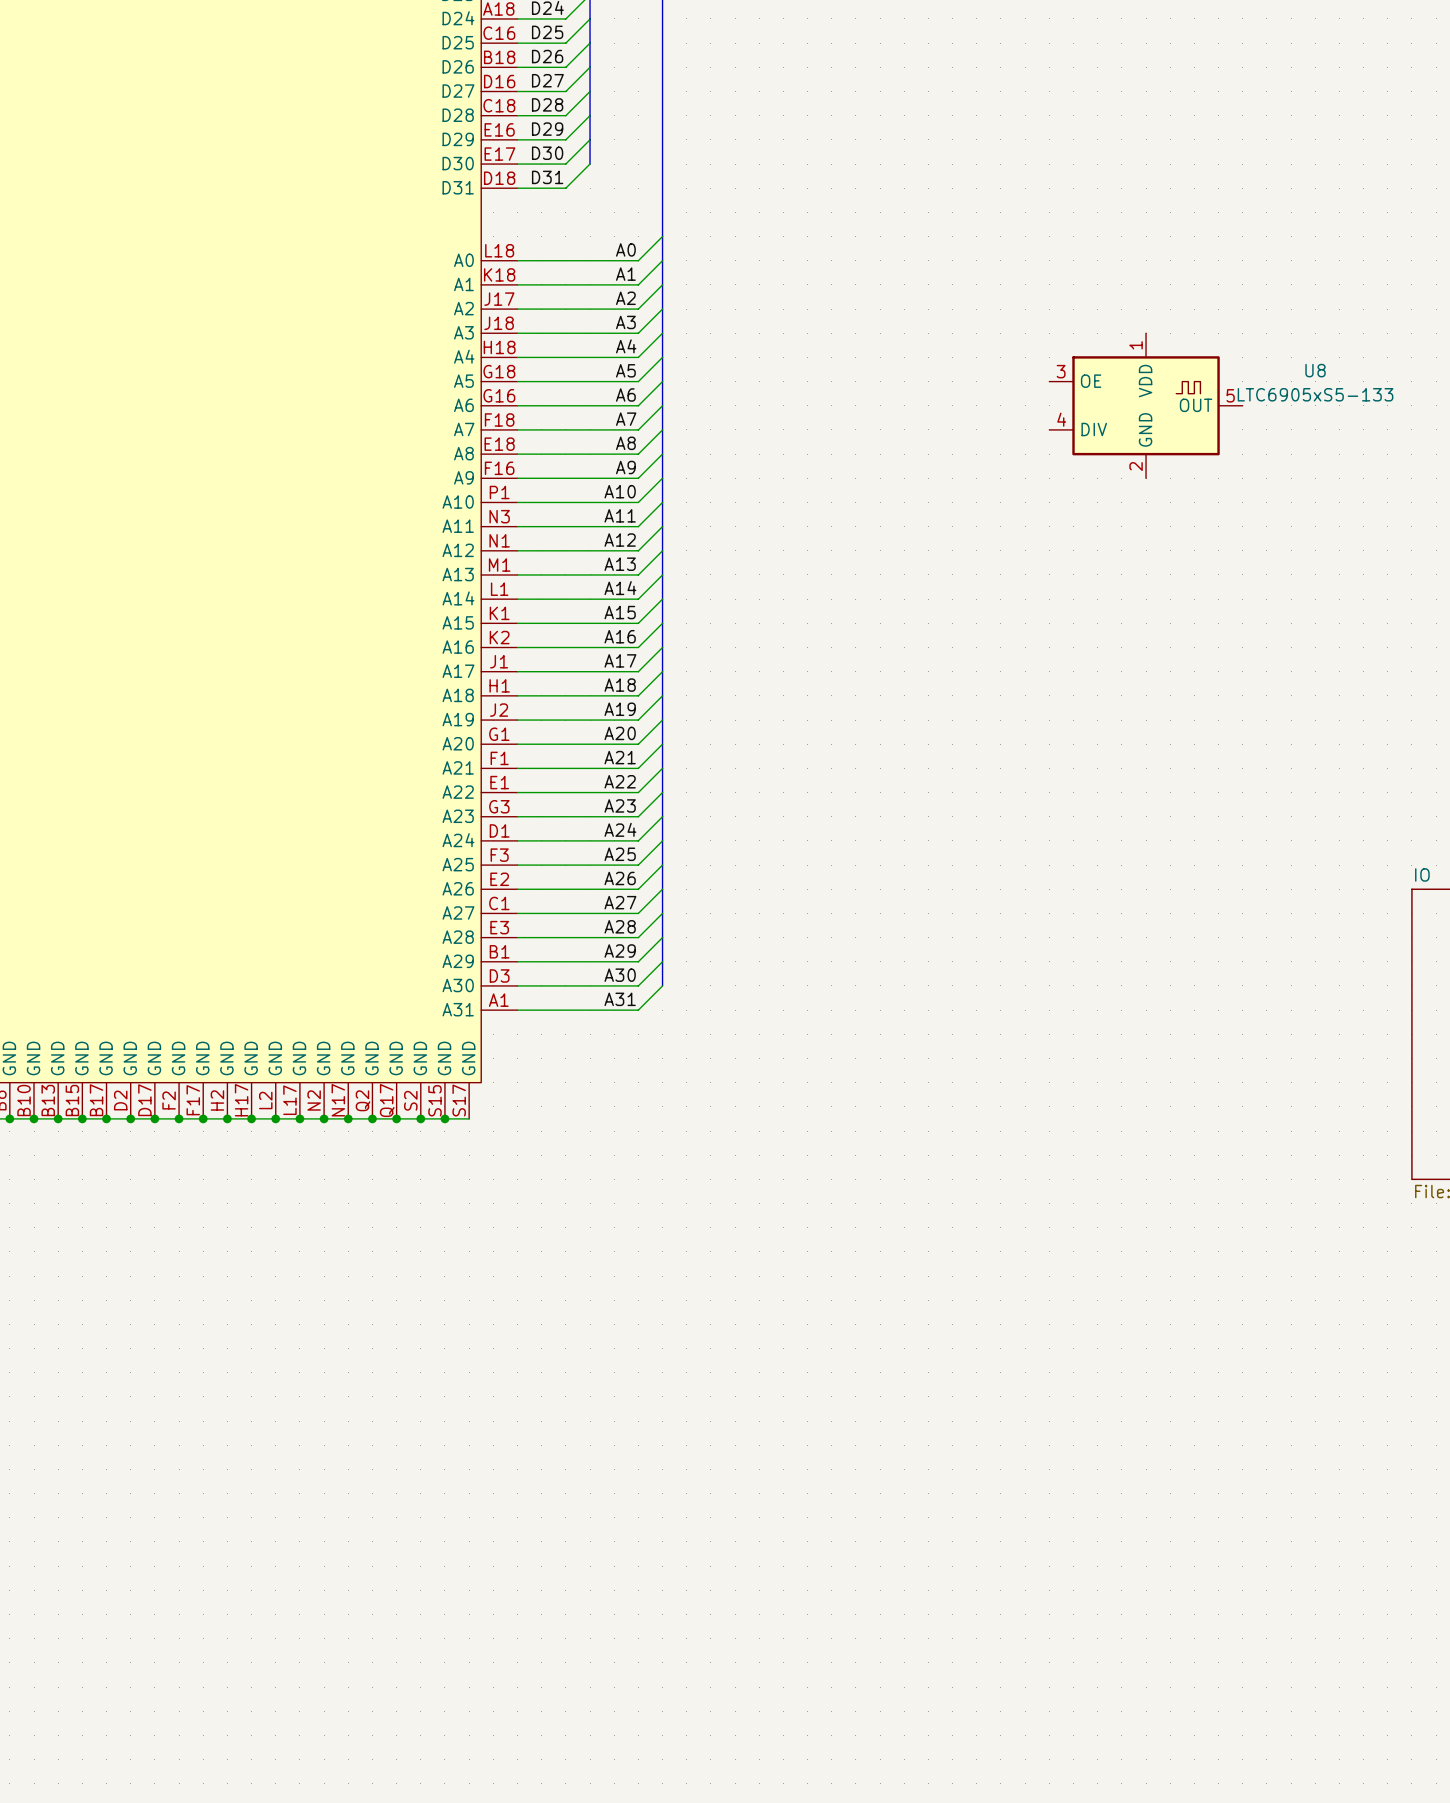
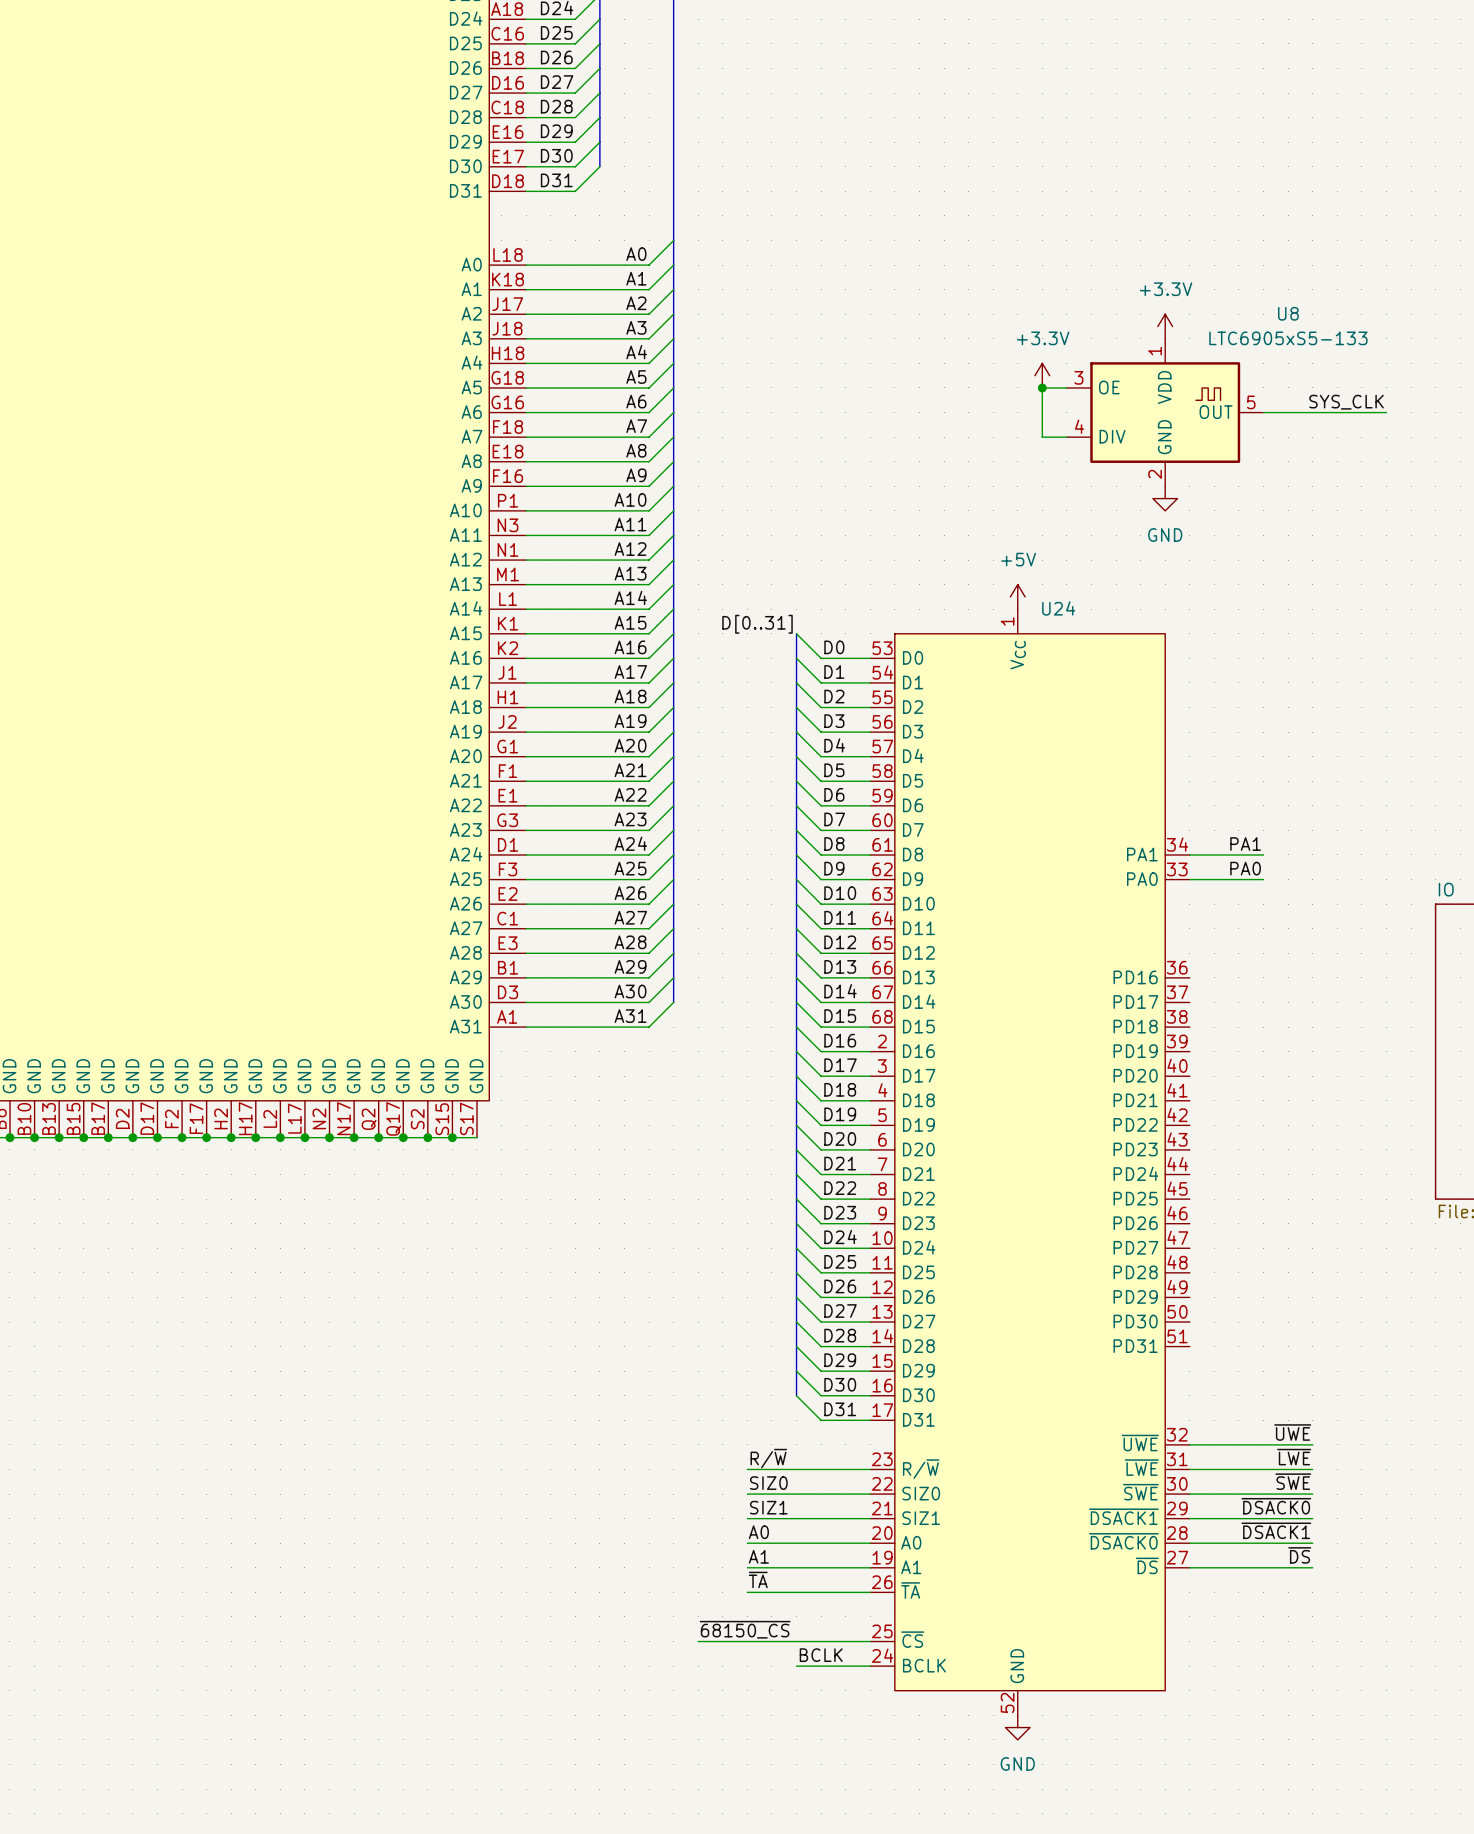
power symbol: none -> +3.3V (1165, 326)
power symbol: none -> +3.3V (1042, 375)
U8 name position: U8 (1315, 370) -> U8 (1288, 313)
junction: none -> (1042, 387)
wire: none -> (1066, 387) (1042, 387) (1042, 437) (1066, 437)
U8 value position: LTC6905xS5-133 (1315, 394) -> LTC6905xS5-133 (1288, 338)
label: none -> SYS_CLK (1346, 402)
wire: none -> (1263, 412) (1386, 412)
power symbol: none -> GND (1165, 498)
power symbol: none -> +5V (1017, 596)
label: none -> D[0..31] (757, 624)
wire: none -> (796, 633) (821, 658) (870, 658)
bus: none -> (796, 633) (796, 1395)
label: none -> D0 (834, 647)
wire: none -> (796, 658) (821, 682) (870, 682)
label: none -> D1 (834, 671)
wire: none -> (796, 682) (821, 707) (870, 707)
label: none -> D2 (834, 696)
wire: none -> (796, 707) (821, 732) (870, 732)
label: none -> D3 (834, 721)
wire: none -> (796, 732) (821, 756) (870, 756)
label: none -> D4 (834, 745)
wire: none -> (796, 756) (821, 781) (870, 781)
label: none -> D5 (834, 770)
wire: none -> (796, 781) (821, 805) (870, 805)
label: none -> D6 (834, 794)
wire: none -> (796, 805) (821, 830) (870, 830)
label: none -> D7 (834, 819)
wire: none -> (796, 830) (821, 854) (870, 854)
label: none -> D8 (834, 844)
label: none -> PA1 (1245, 844)
wire: none -> (796, 854) (821, 879) (870, 879)
wire: none -> (1189, 854) (1263, 854)
label: none -> D9 (834, 868)
label: none -> PA0 (1245, 868)
wire: none -> (796, 879) (821, 904) (870, 904)
wire: none -> (1189, 879) (1263, 879)
label: none -> D10 (840, 893)
wire: none -> (796, 904) (821, 928) (870, 928)
label: none -> D11 (840, 917)
wire: none -> (796, 928) (821, 953) (870, 953)
label: none -> D12 (840, 942)
wire: none -> (796, 953) (821, 977) (870, 977)
label: none -> D13 (840, 966)
wire: none -> (796, 977) (821, 1002) (870, 1002)
label: none -> D14 (840, 991)
wire: none -> (796, 1002) (821, 1027) (870, 1027)
label: none -> D15 (840, 1016)
wire: none -> (796, 1027) (821, 1051) (870, 1051)
label: none -> D16 (840, 1040)
wire: none -> (796, 1051) (821, 1076) (870, 1076)
label: none -> D17 (840, 1065)
wire: none -> (796, 1076) (821, 1100) (870, 1100)
label: none -> D18 (840, 1089)
wire: none -> (796, 1100) (821, 1125) (870, 1125)
label: none -> D19 (840, 1114)
wire: none -> (796, 1125) (821, 1149) (870, 1149)
label: none -> D20 (840, 1138)
wire: none -> (796, 1149) (821, 1174) (870, 1174)
U24: none -> (1030, 1162)
label: none -> D21 (840, 1163)
wire: none -> (796, 1174) (821, 1199) (870, 1199)
label: none -> D22 (840, 1188)
wire: none -> (796, 1199) (821, 1223) (870, 1223)
label: none -> D23 (840, 1212)
wire: none -> (796, 1223) (821, 1248) (870, 1248)
label: none -> D24 (840, 1237)
wire: none -> (796, 1248) (821, 1272) (870, 1272)
label: none -> D25 (840, 1261)
wire: none -> (796, 1272) (821, 1297) (870, 1297)
label: none -> D26 (840, 1286)
wire: none -> (796, 1297) (821, 1322) (870, 1322)
label: none -> D27 (840, 1311)
wire: none -> (796, 1322) (821, 1346) (870, 1346)
label: none -> D28 (840, 1335)
wire: none -> (796, 1346) (821, 1371) (870, 1371)
label: none -> D29 (840, 1360)
wire: none -> (796, 1371) (821, 1395) (870, 1395)
label: none -> D30 (840, 1384)
wire: none -> (796, 1395) (821, 1420) (870, 1420)
label: none -> D31 (840, 1409)
label: none -> ~{UWE} (1292, 1432)
wire: none -> (1189, 1444) (1312, 1444)
label: none -> ~{LWE} (1294, 1457)
label: none -> R/~{W} (768, 1458)
wire: none -> (747, 1469) (870, 1469)
wire: none -> (1189, 1469) (1312, 1469)
label: none -> ~{SWE} (1293, 1481)
label: none -> SIZ0 (768, 1483)
wire: none -> (747, 1494) (870, 1494)
wire: none -> (1189, 1494) (1312, 1494)
label: none -> ~{DSACK0} (1276, 1506)
label: none -> SIZ1 (768, 1507)
wire: none -> (747, 1518) (870, 1518)
wire: none -> (1189, 1518) (1312, 1518)
label: none -> ~{DSACK1} (1276, 1530)
label: none -> A0 (758, 1532)
wire: none -> (747, 1543) (870, 1543)
wire: none -> (1189, 1543) (1312, 1543)
label: none -> ~{DS} (1299, 1555)
label: none -> A1 (758, 1556)
wire: none -> (747, 1567) (870, 1567)
wire: none -> (1189, 1567) (1312, 1567)
label: none -> ~{TA} (758, 1579)
wire: none -> (747, 1592) (870, 1592)
label: none -> ~{68150_CS} (745, 1629)
wire: none -> (698, 1641) (870, 1641)
label: none -> BCLK (821, 1655)
wire: none -> (796, 1666) (870, 1666)
power symbol: none -> GND (1017, 1727)

